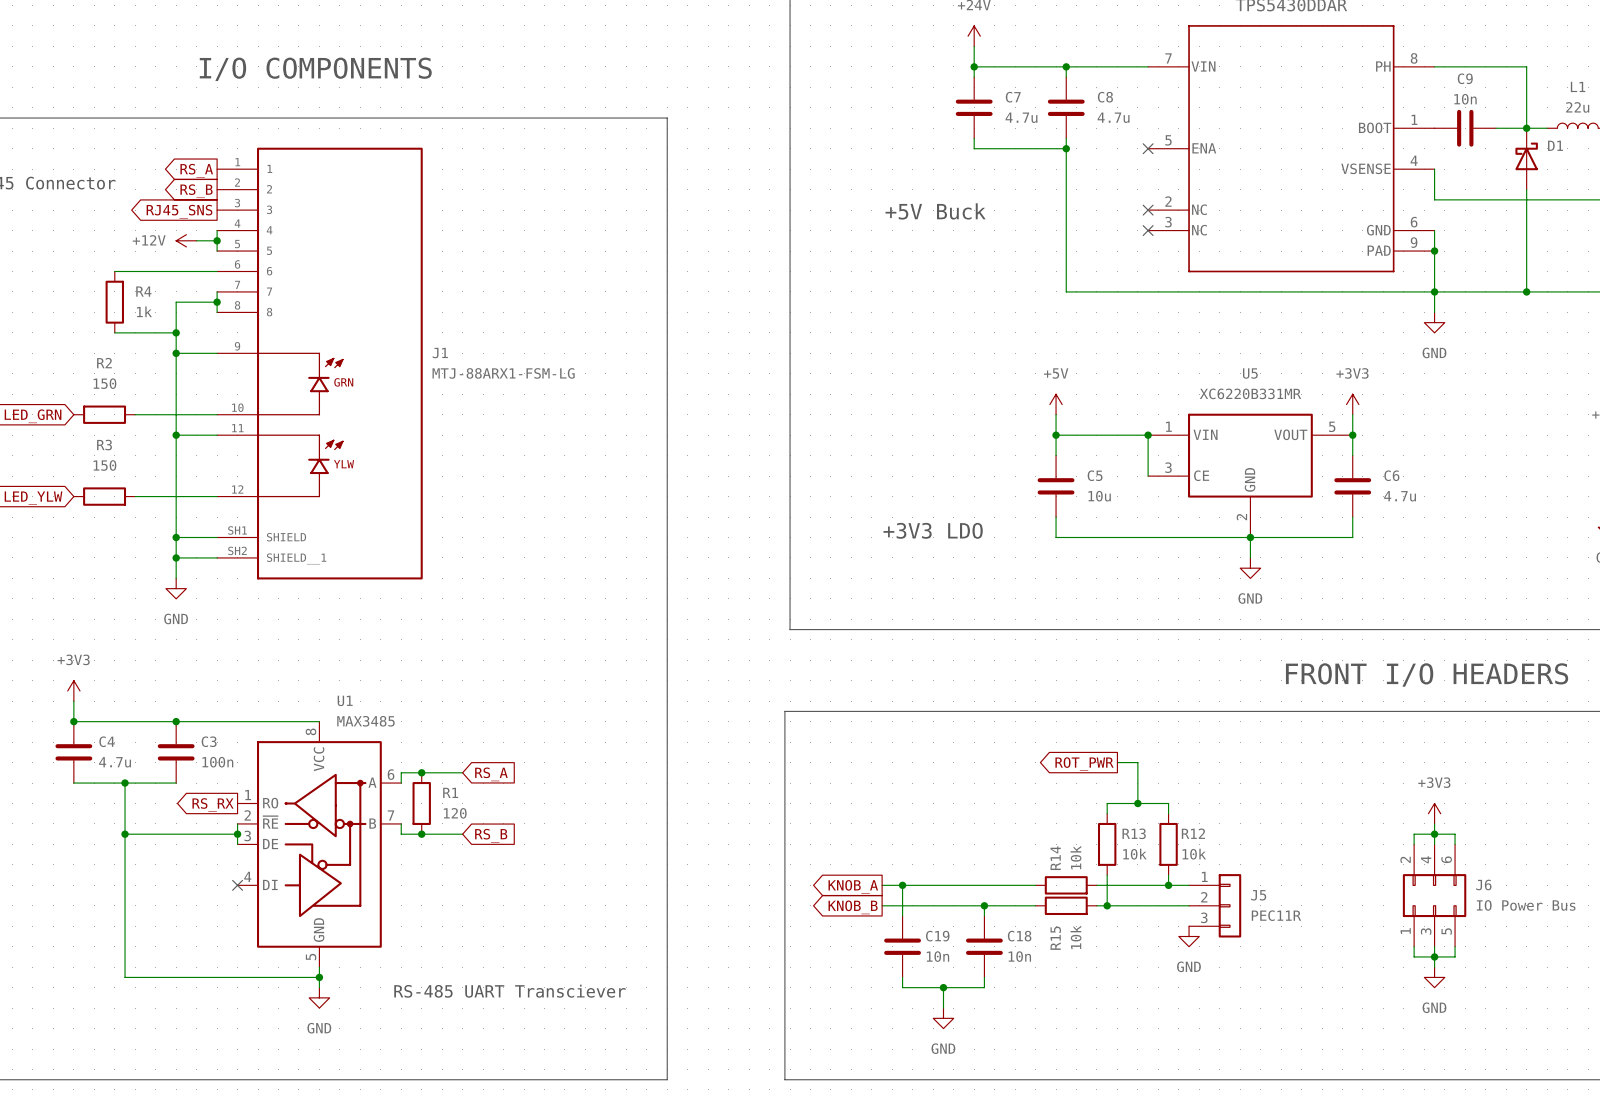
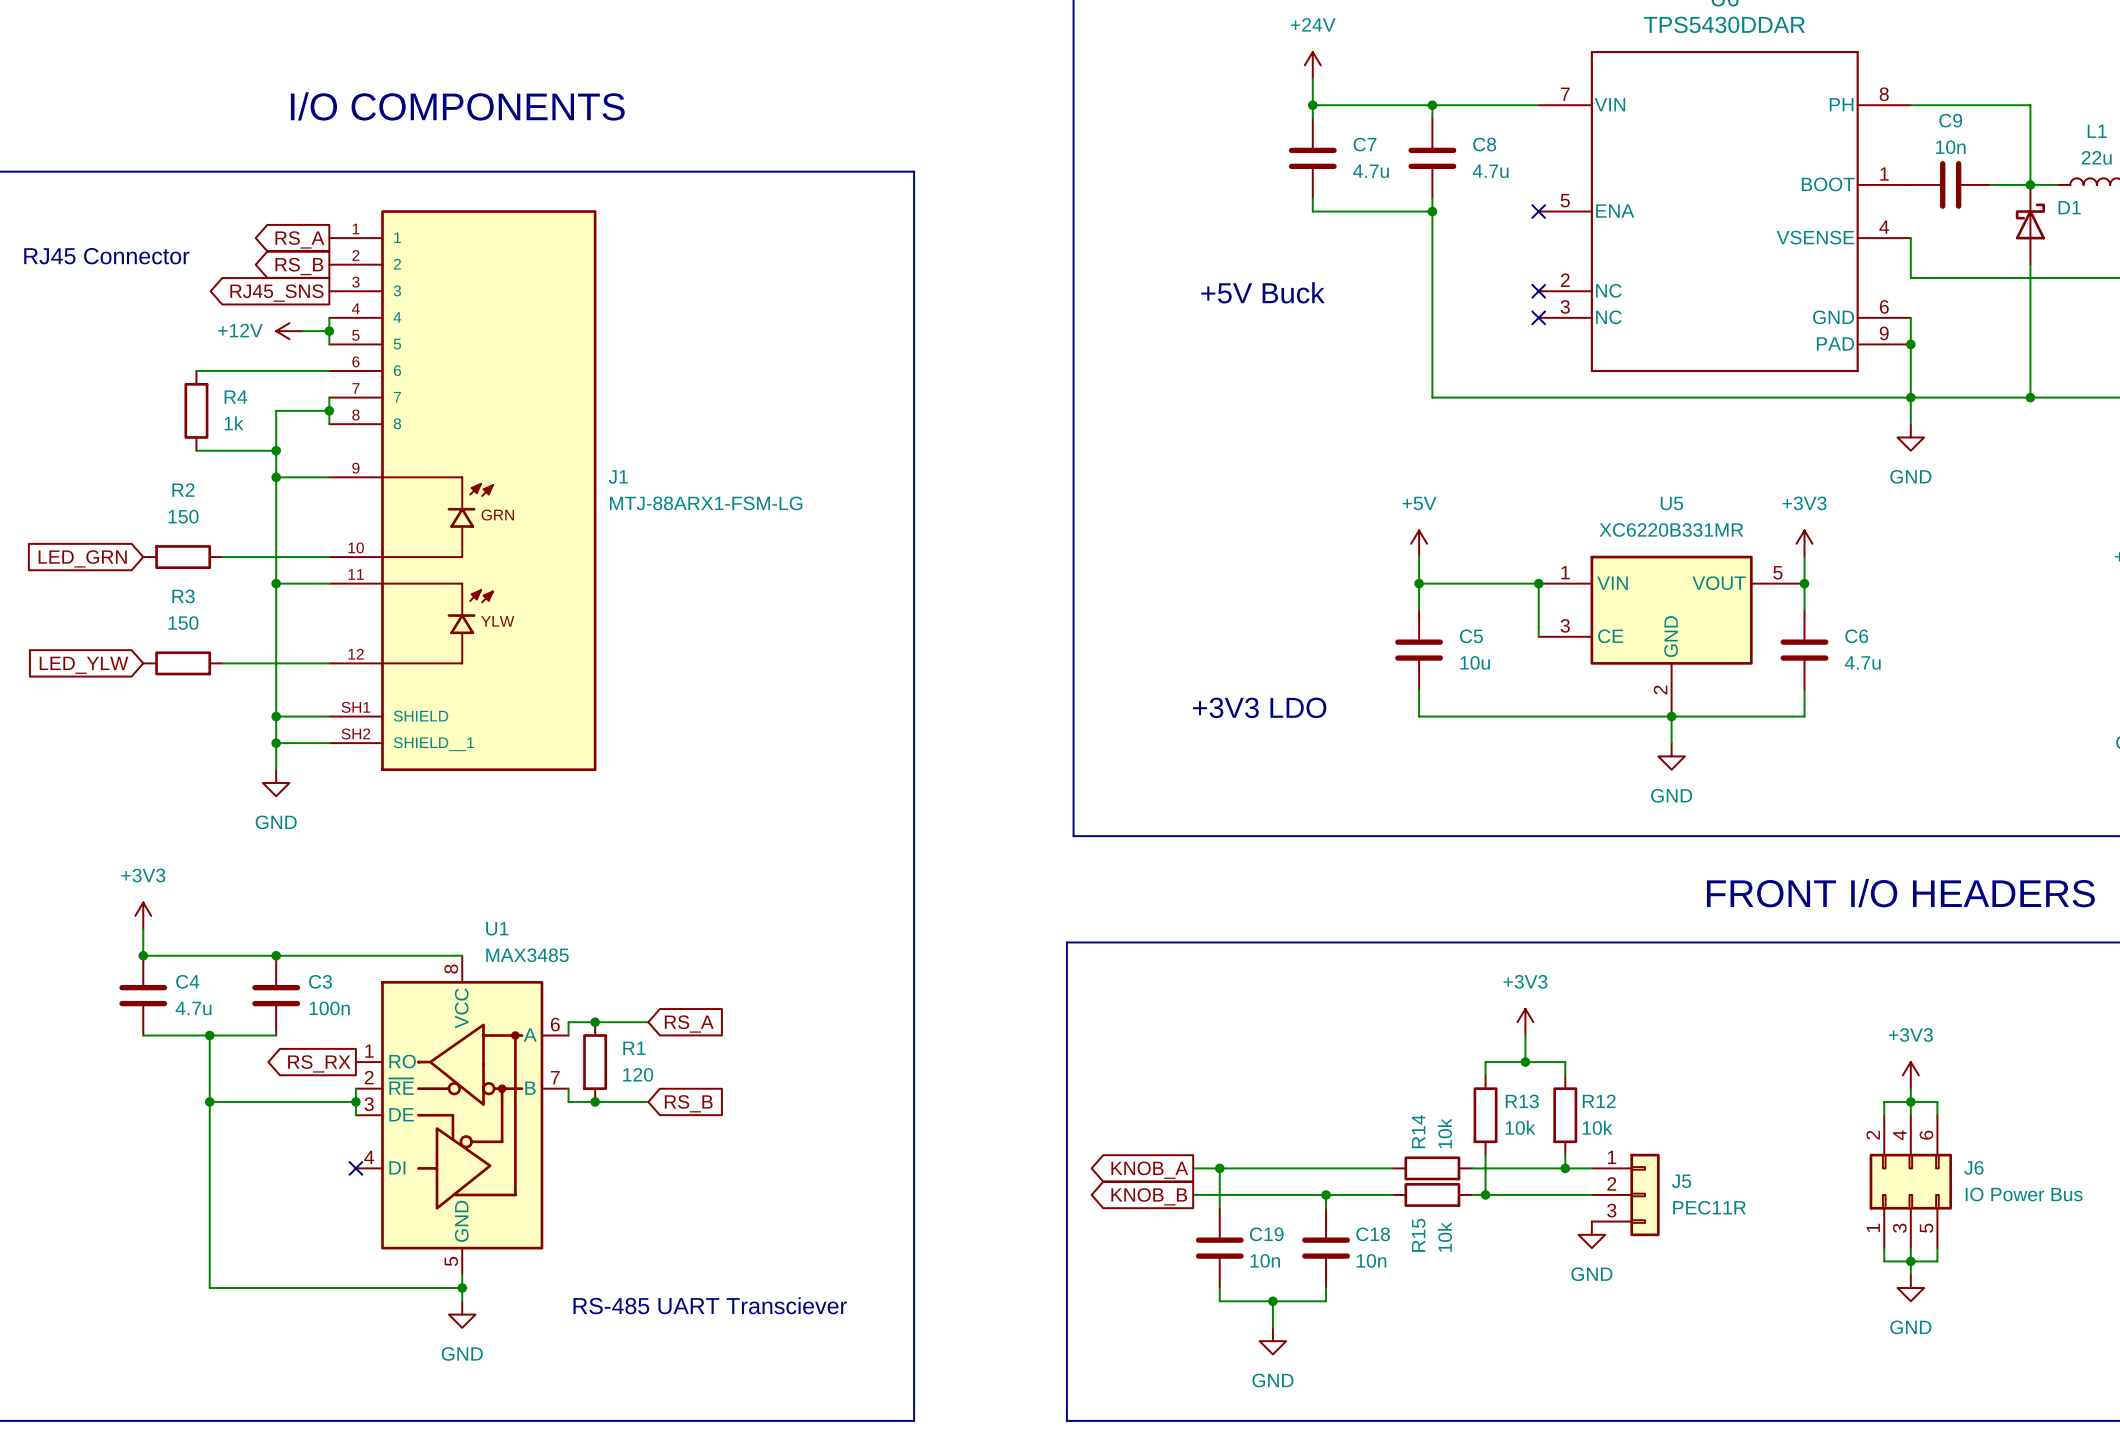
wire: (1117, 762) (1137, 762) (1137, 783) -> none
global label: ROT_PWR (1084, 764) -> none
power symbol: none -> +3V3 (1525, 1022)

